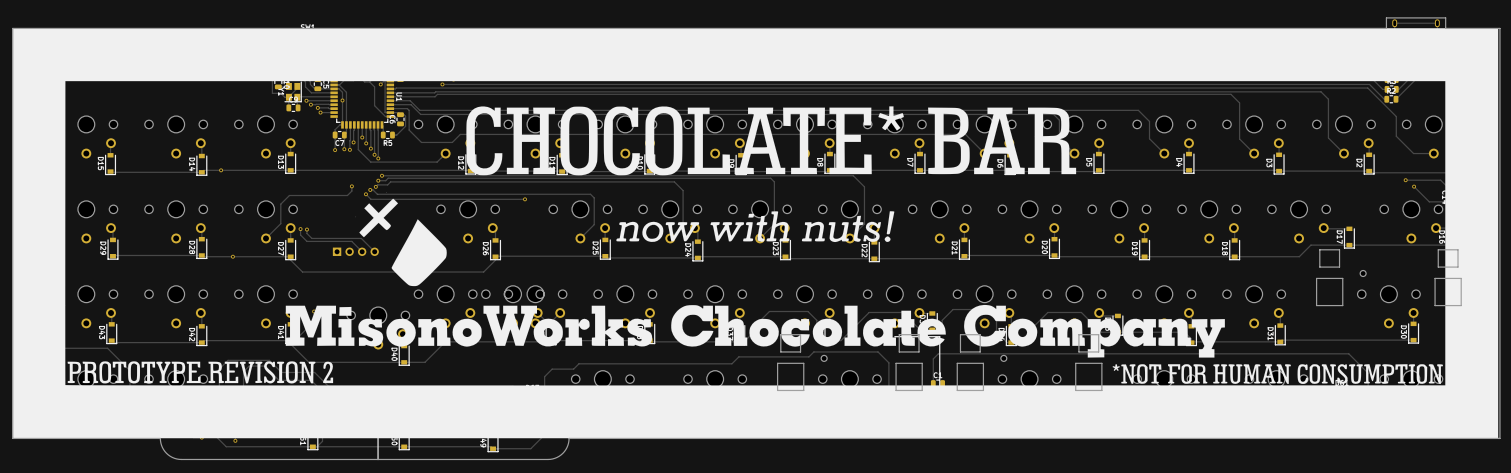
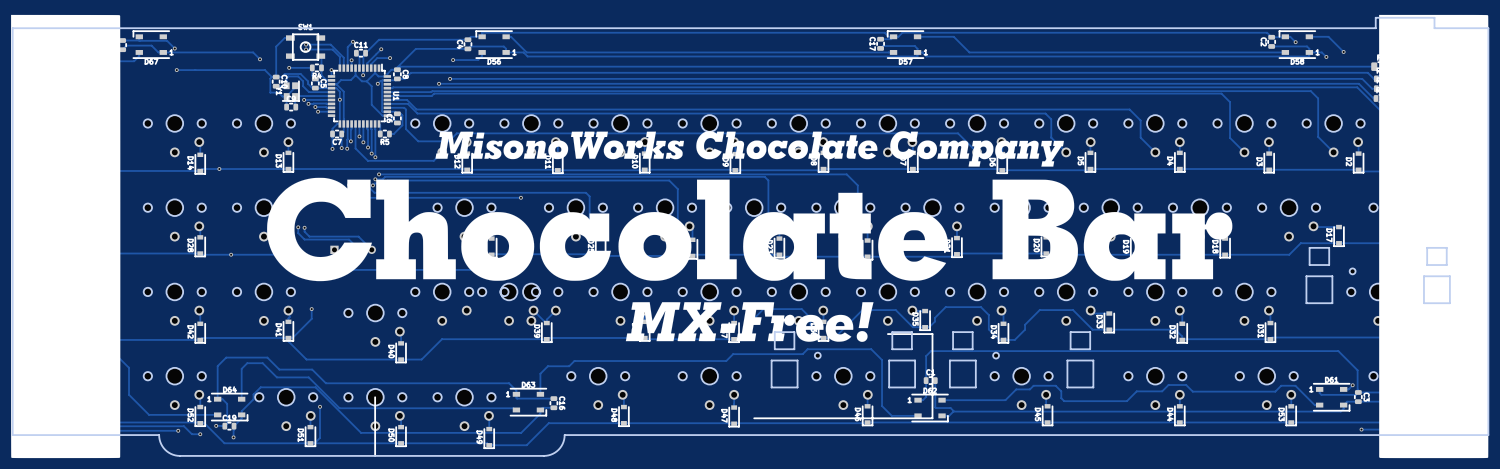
drawing: none -> [11, 14, 1489, 459]
drawing: [12, 28, 1499, 439] -> none

